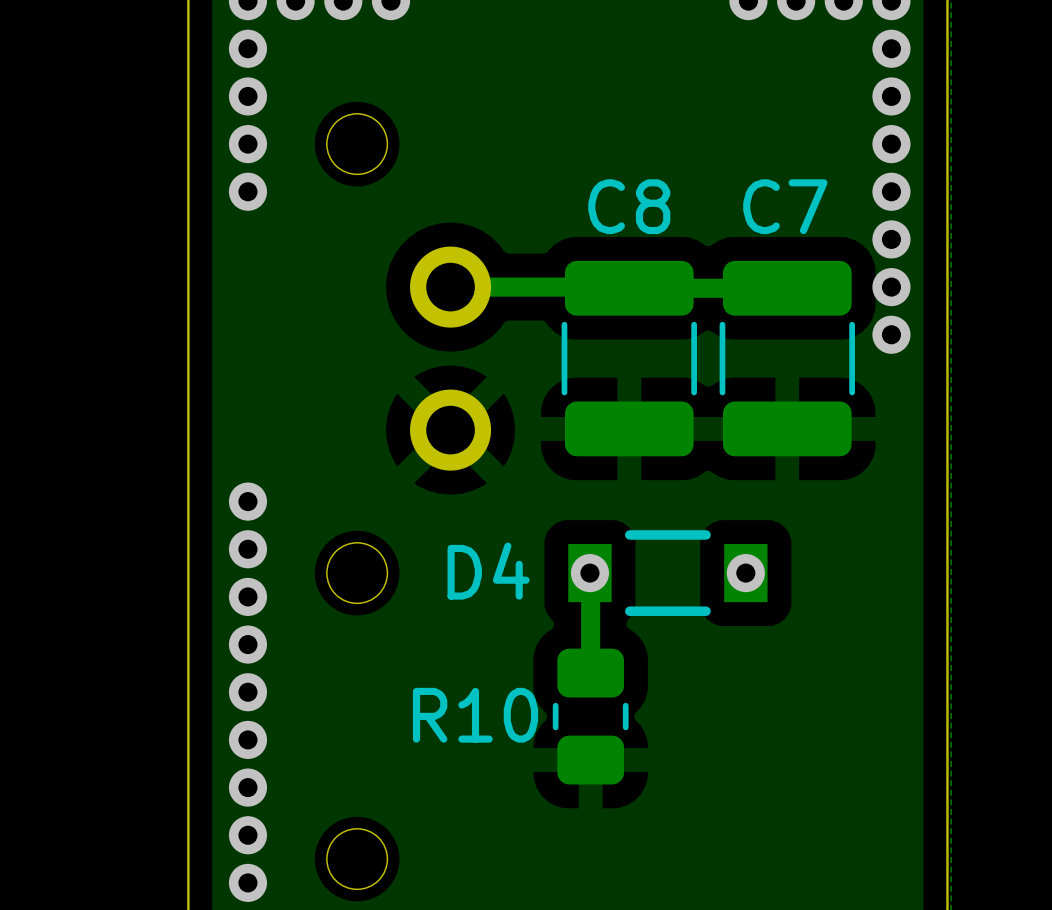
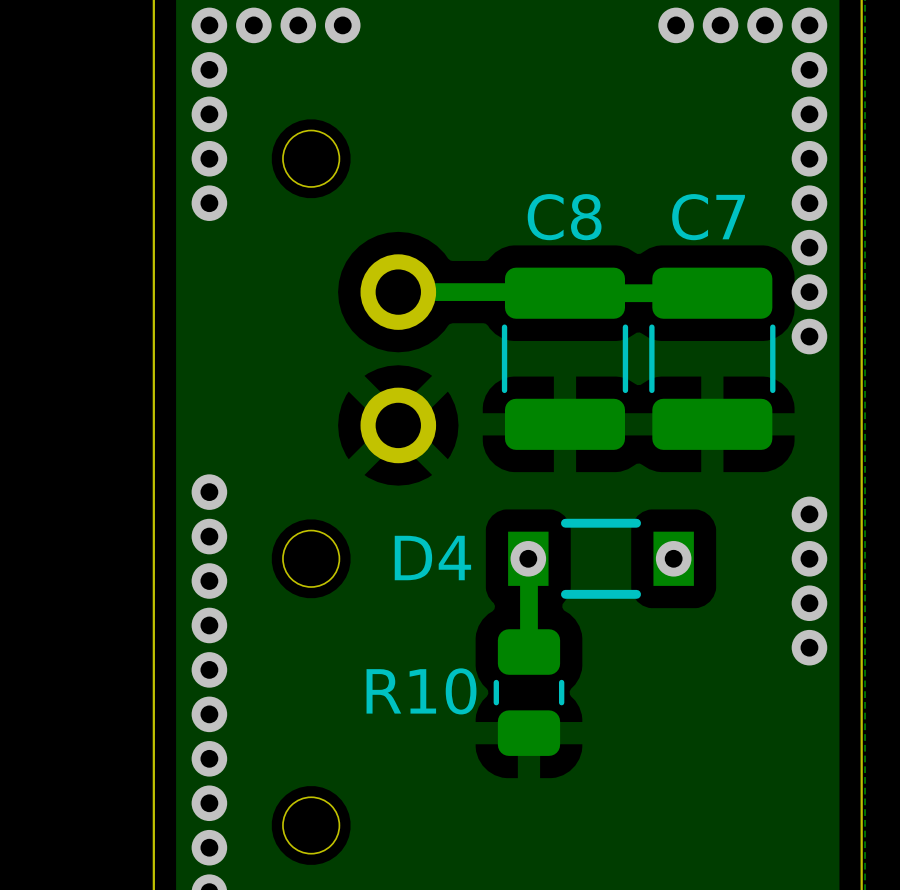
via: none -> (809, 514)
via: none -> (809, 558)
via: none -> (809, 603)
via: none -> (809, 647)

